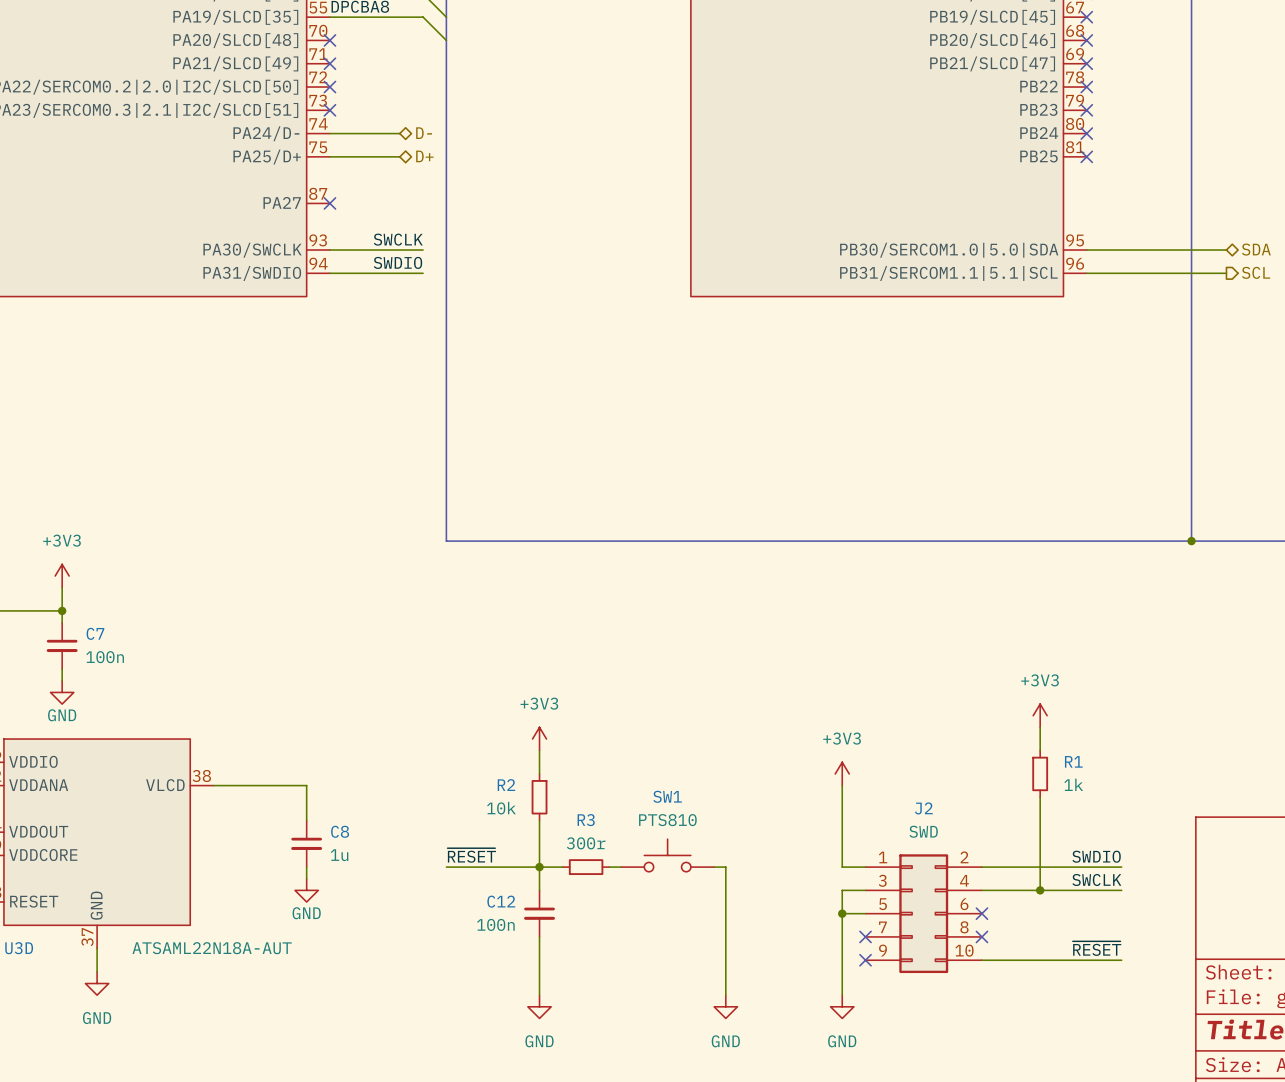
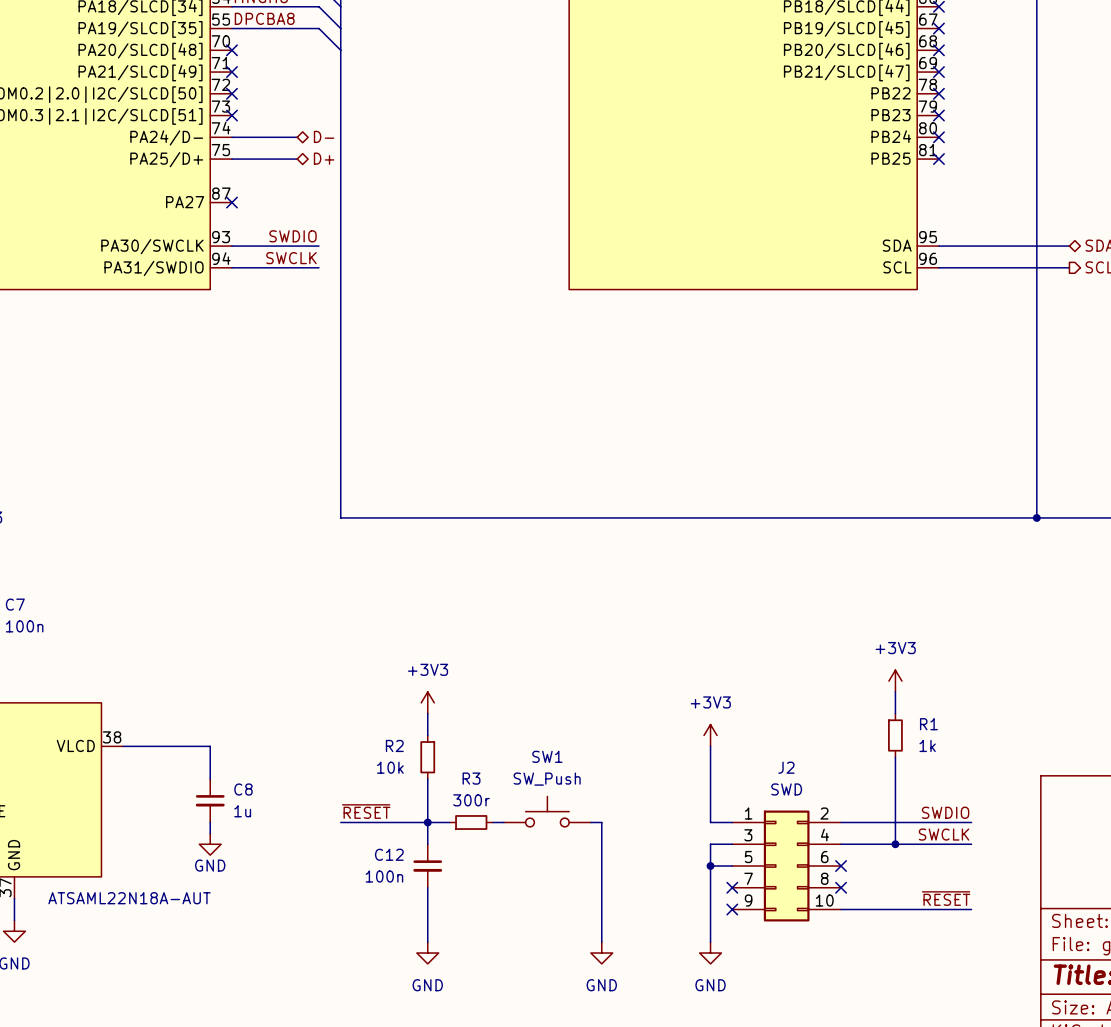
label: SWCLK (398, 239) -> SWDIO (293, 236)
part pin name: PB30/SERCOM1.0|5.0|SDA (949, 250) -> SDA (897, 245)
label: SWDIO (397, 262) -> SWCLK (291, 258)
part pin name: PB31/SERCOM1.1|5.1|SCL (948, 273) -> SCL (897, 267)
SW1 value: PTS810 (667, 820) -> SW_Push (547, 779)

